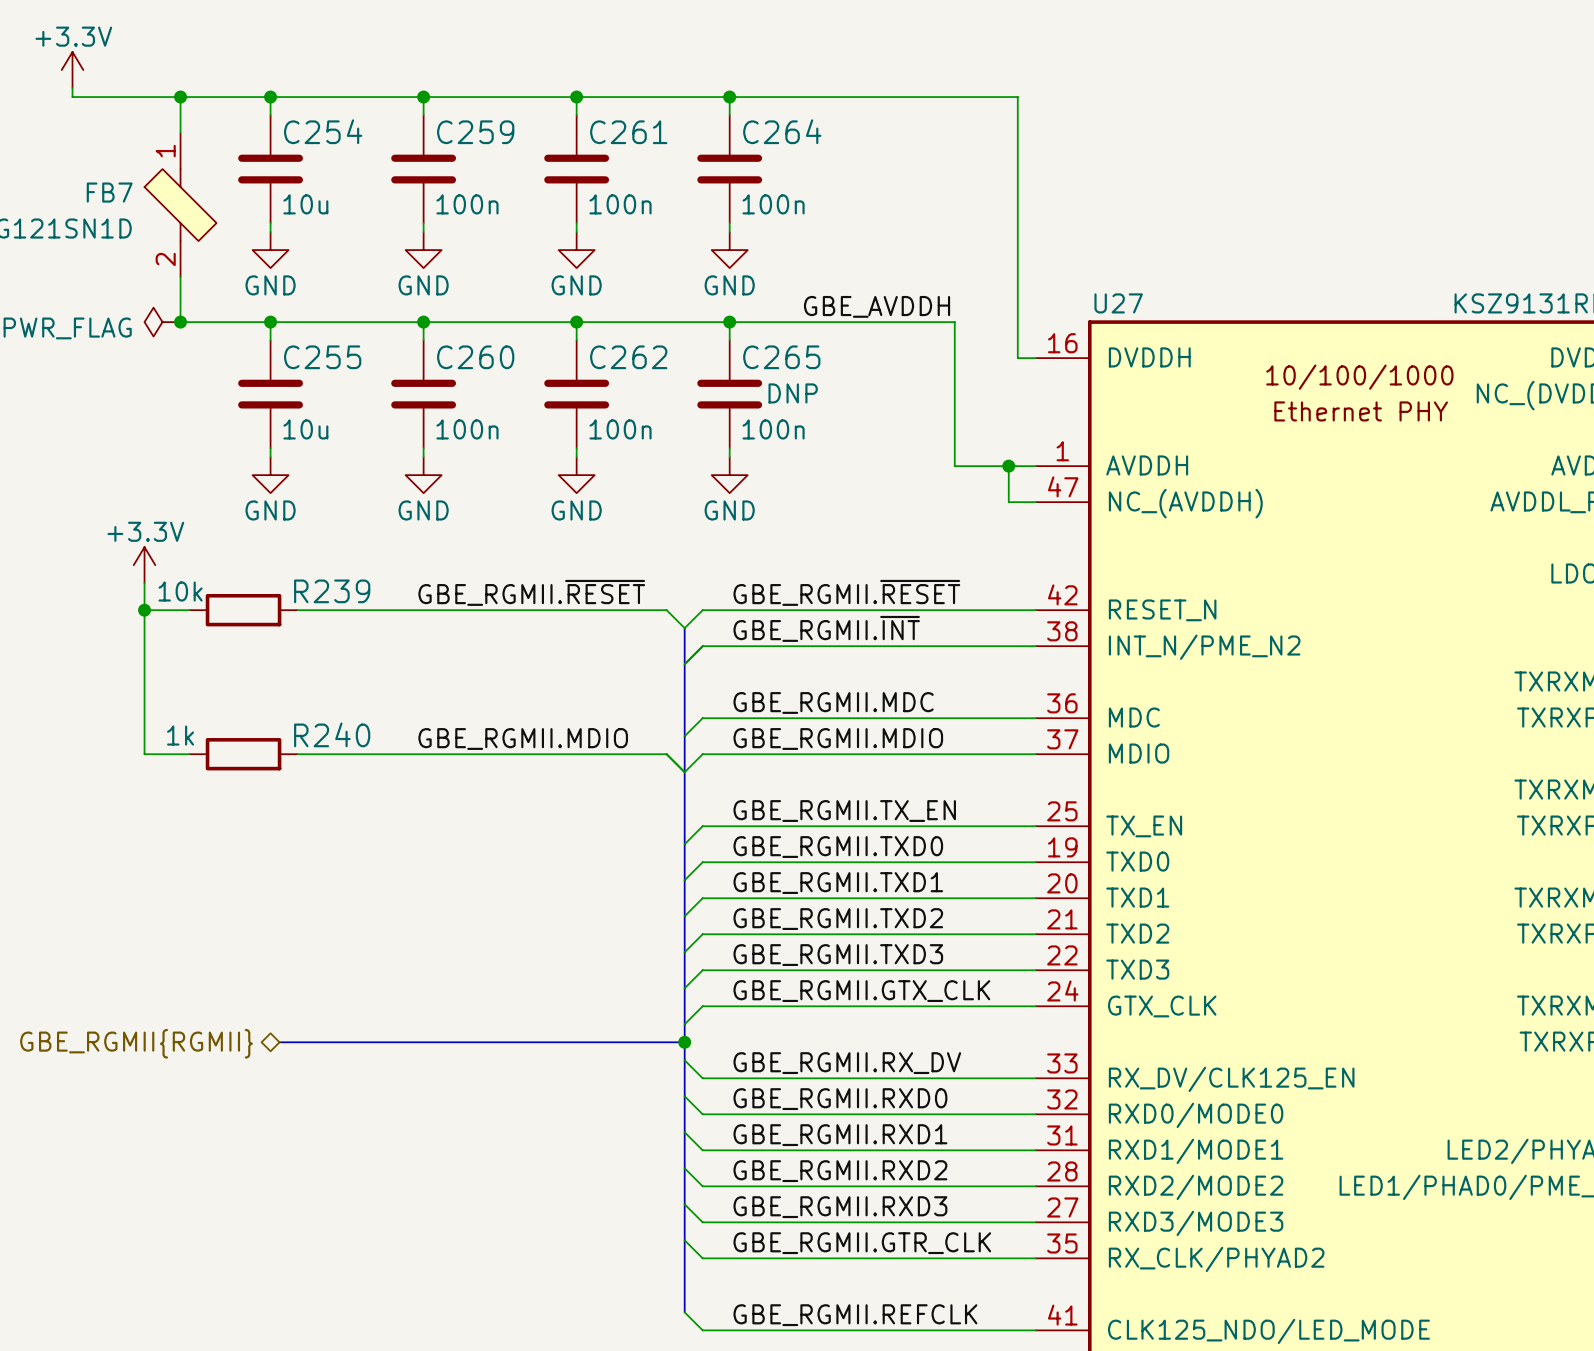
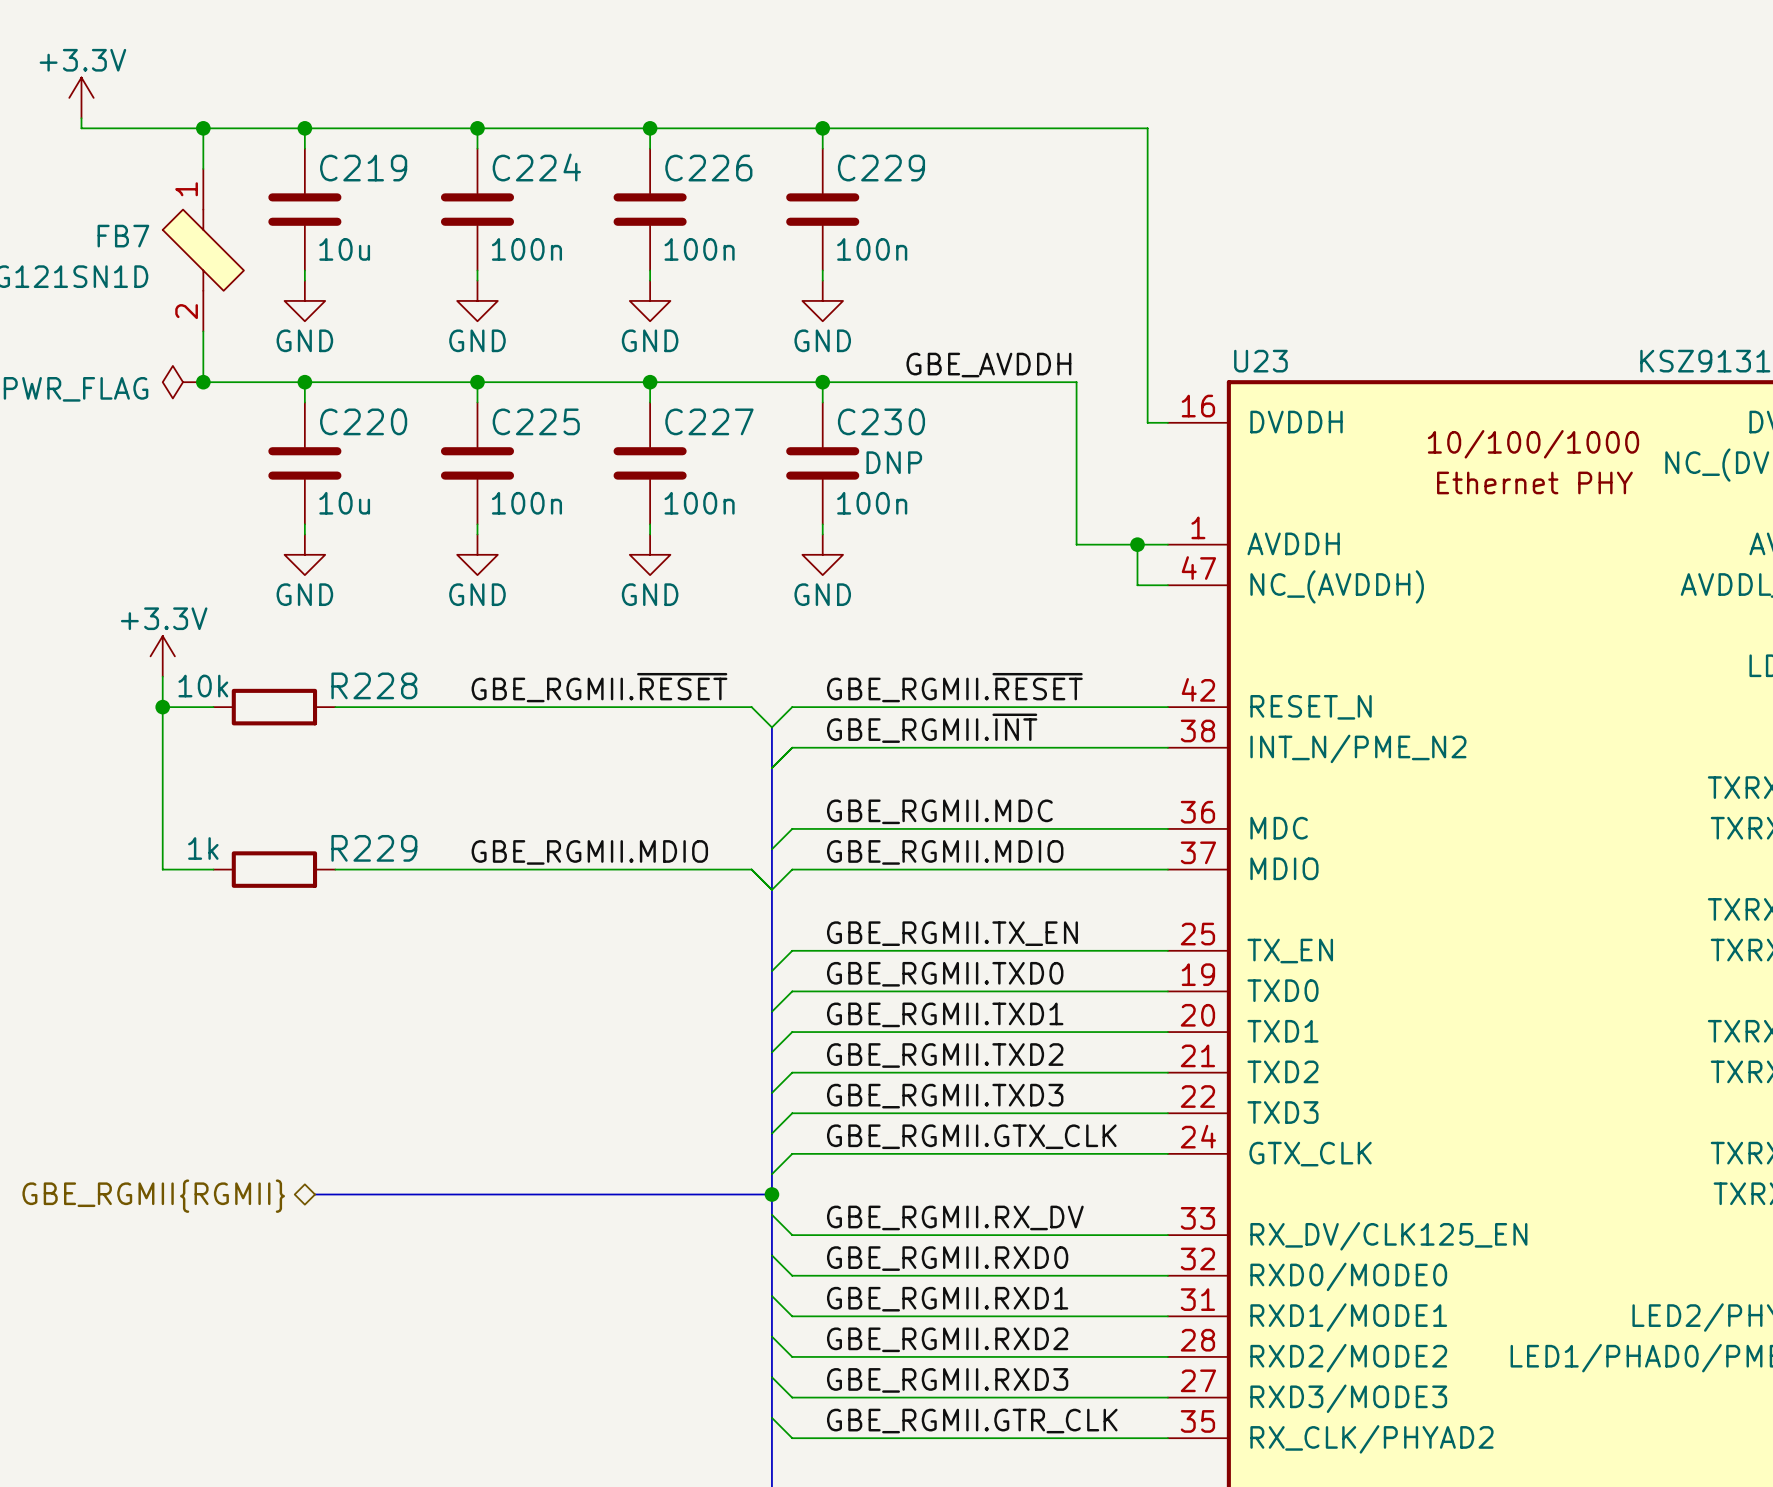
C254 name: C254 (323, 131) -> C219 (363, 168)
C264 name: C264 (782, 131) -> C229 (881, 168)
C259 name: C259 (475, 132) -> C224 (536, 167)
C261 name: C261 (628, 132) -> C226 (708, 168)
U27 name: U27 (1118, 303) -> U23 (1260, 361)
C255 name: C255 (322, 357) -> C220 (363, 421)
C260 name: C260 (475, 357) -> C225 (536, 421)
C262 name: C262 (628, 357) -> C227 (709, 421)
C265 name: C265 (781, 357) -> C230 (881, 421)
R239 name: R239 (332, 591) -> R228 (374, 685)
R240 name: R240 (332, 734) -> R229 (374, 848)

